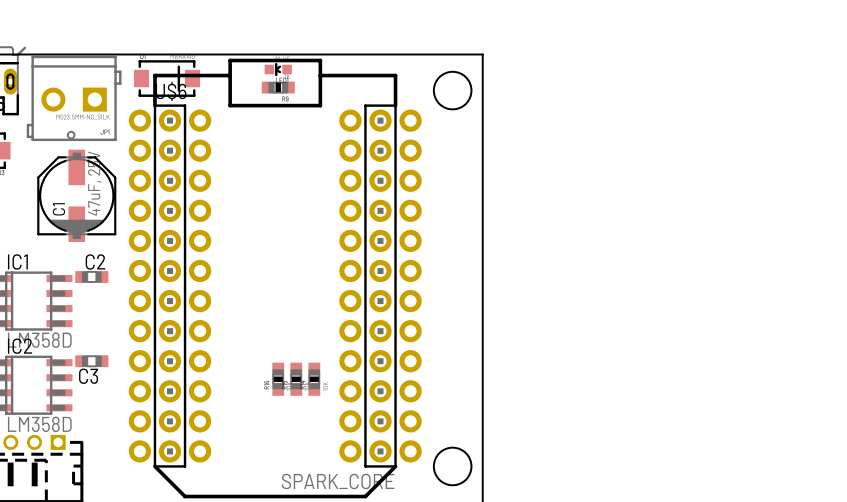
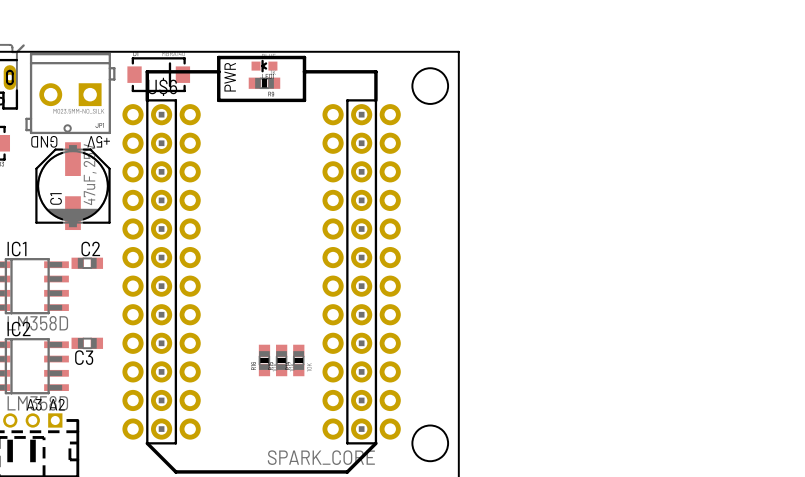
text: none -> PWR (230, 77)
text: none -> GND (44, 141)
text: none -> +5V (98, 141)
text: none -> A3 (34, 404)
text: none -> A2 (57, 404)

